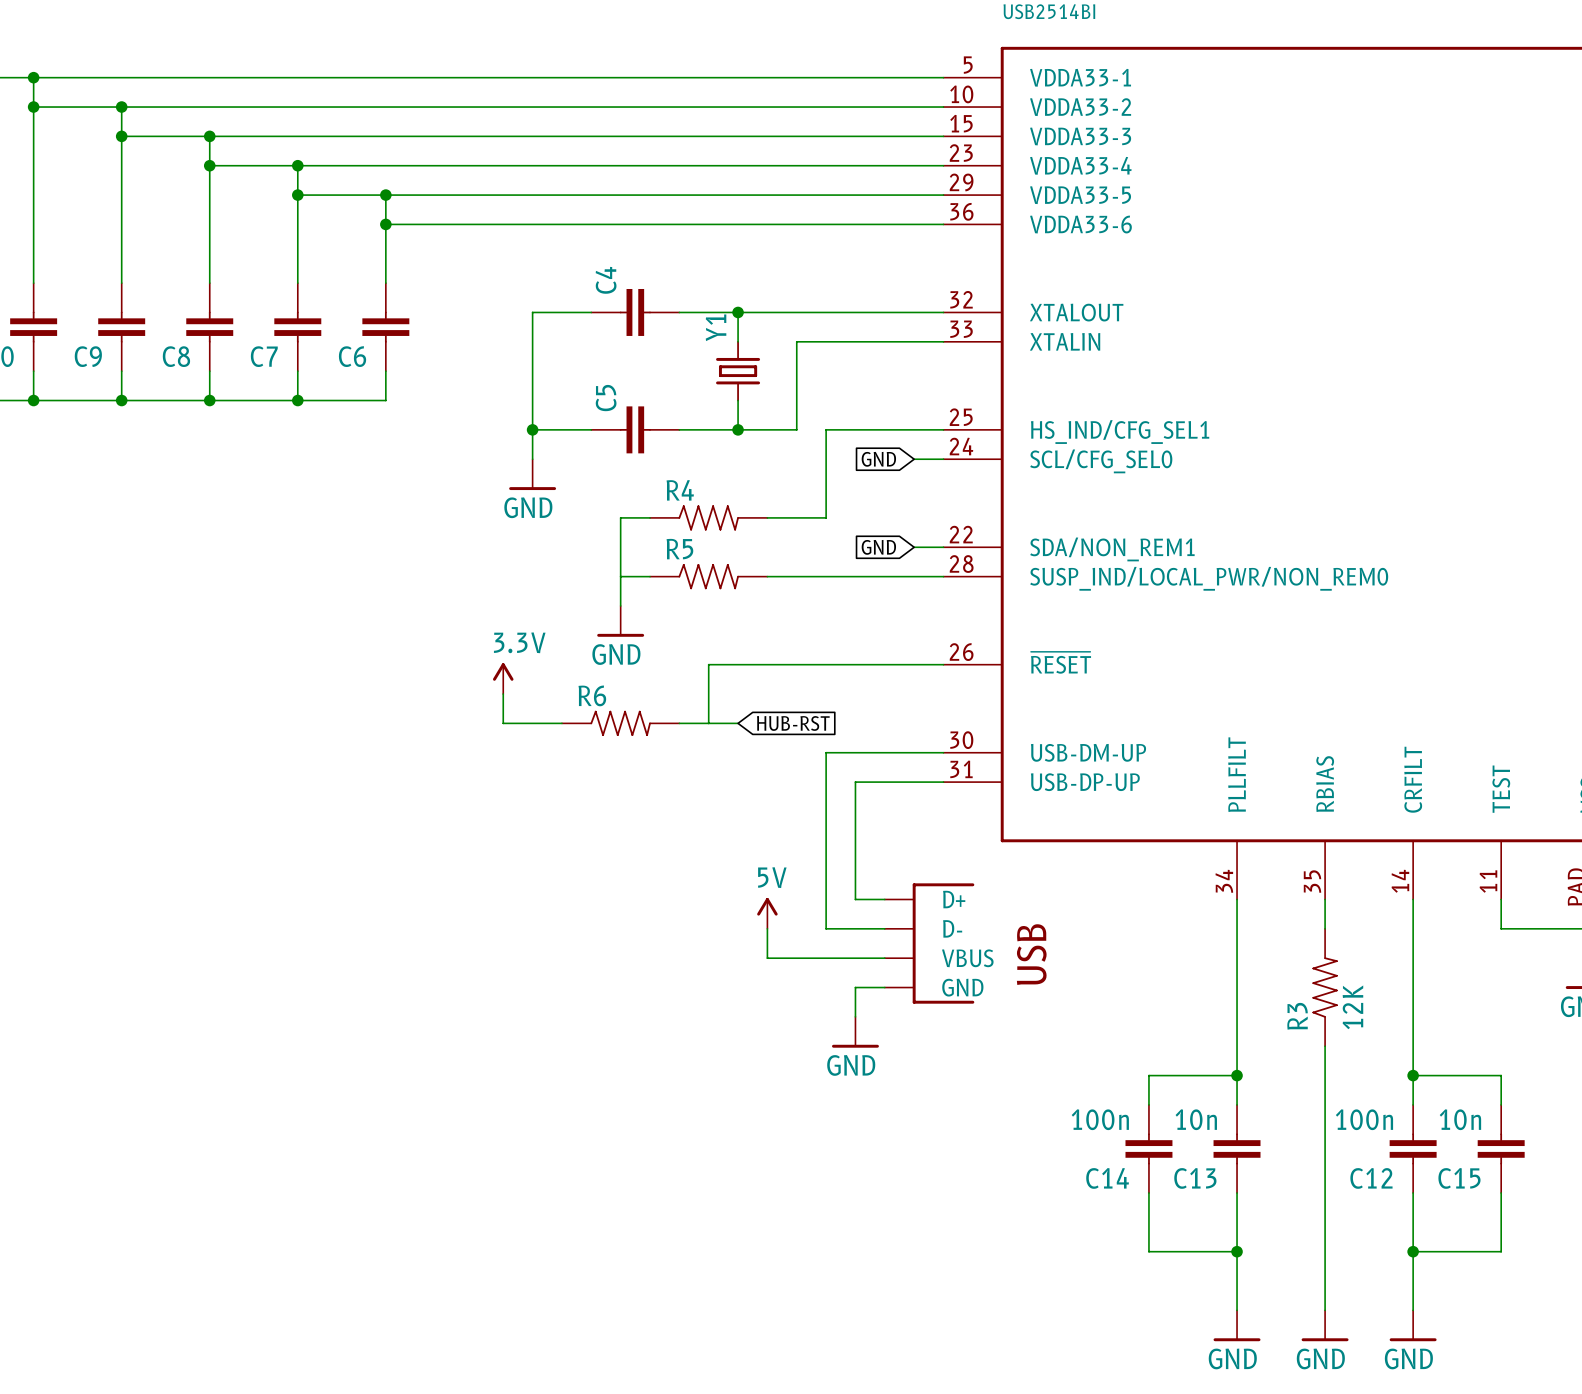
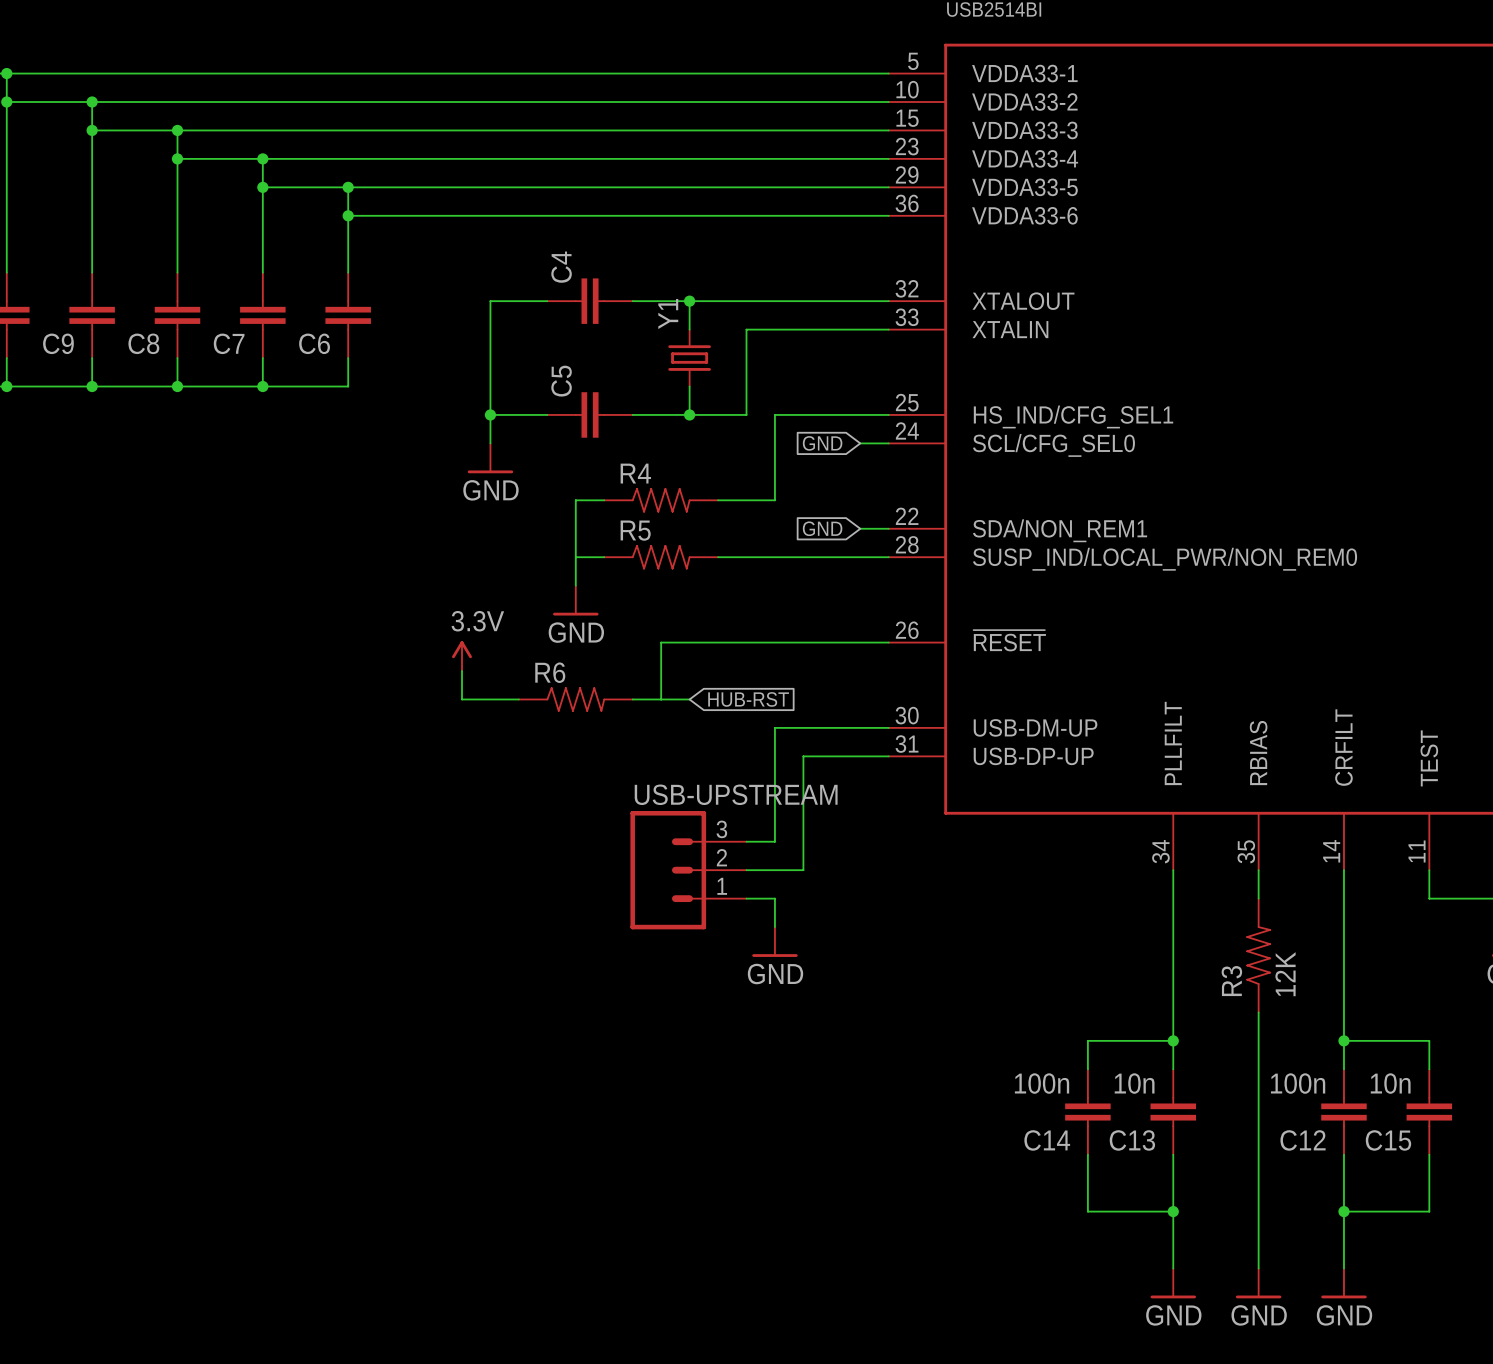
wire: (826, 870) (826, 928) (884, 928) -> (774, 841) (746, 841)
USB-UPSTREAM: none -> (688, 870)
wire: (855, 899) (884, 899) -> (803, 870) (746, 870)
power symbol: 5V (767, 913) -> none
wire: (767, 928) (767, 958) (884, 958) -> none
wire: none -> (746, 898) (774, 898) (774, 927)
part: (929, 943) -> none
wire: (884, 987) (855, 987) (855, 1016) -> none
power symbol position: GND (855, 1032) -> GND (774, 942)

